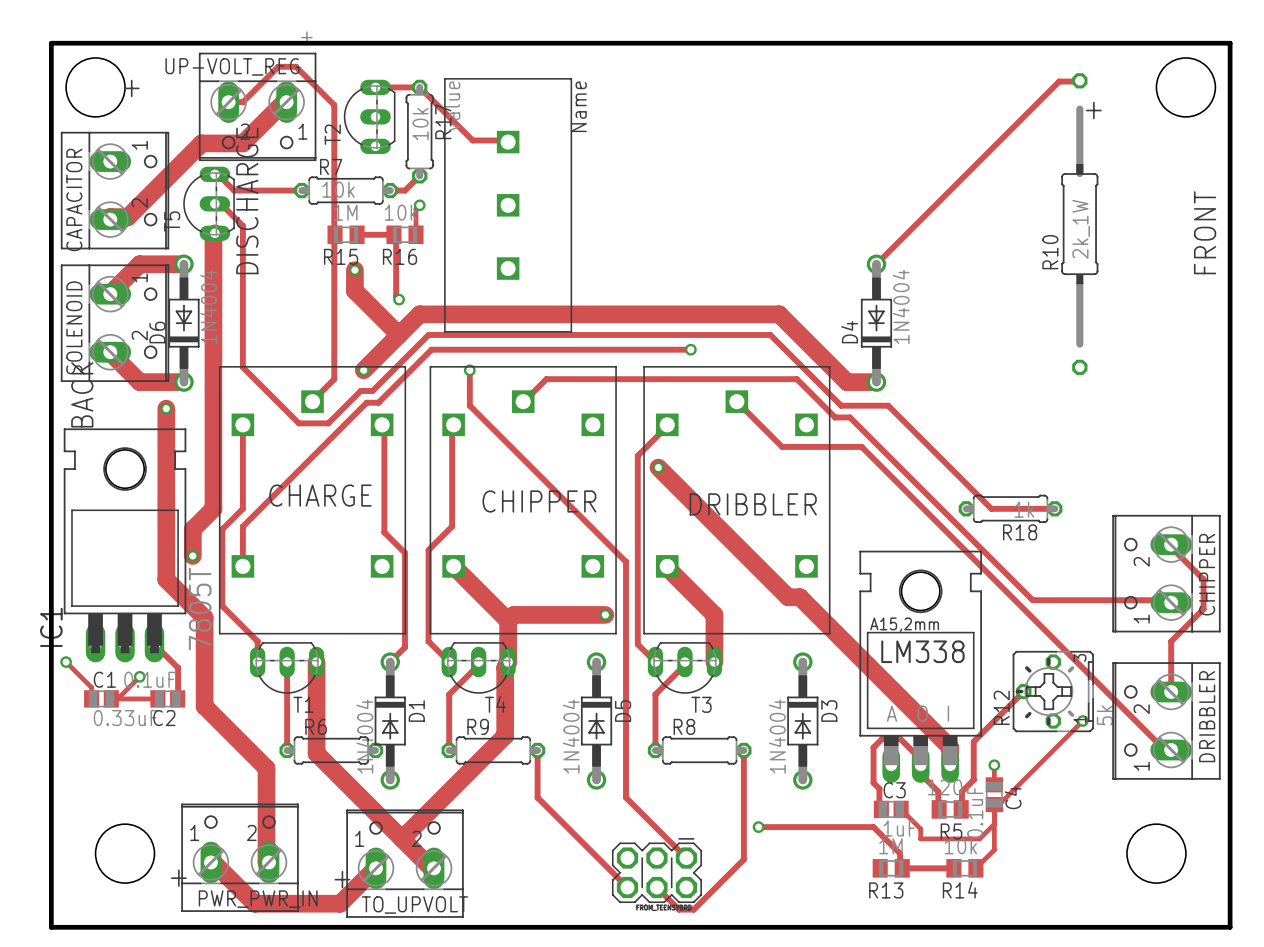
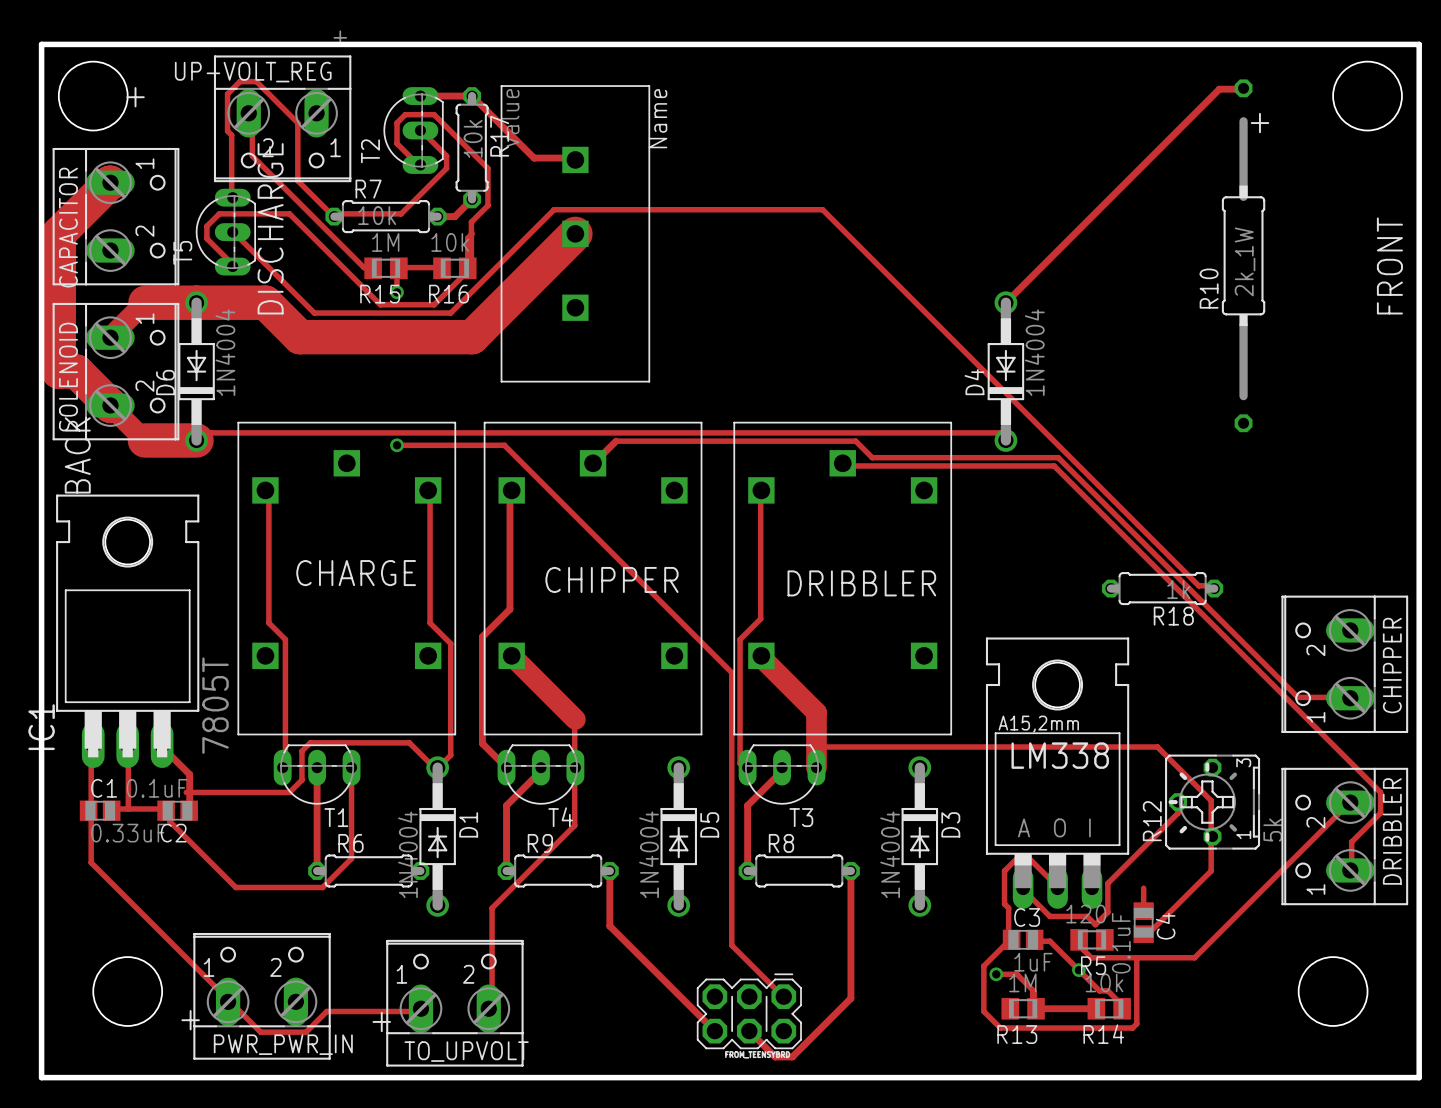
track: (228, 102) (242, 102) (278, 66) (295, 66) (334, 105) (334, 379) (312, 401) -> (248, 113) (252, 114) (252, 156) (363, 267) (373, 268)
track: (286, 102) (284, 102) (242, 143) (201, 143) (127, 217) (110, 217) (110, 219) -> none
track: none -> (110, 182) (58, 233) (58, 371) (76, 371) (110, 406)
track: (214, 174) (216, 172) (234, 190) (301, 190) -> (232, 197) (231, 135) (227, 131) (227, 94) (239, 81) (256, 81) (297, 122) (297, 180) (334, 216) (335, 213) (401, 213) (446, 168) (446, 156) (420, 130)
track: (214, 203) (222, 205) (242, 225) (242, 367) (298, 423) (328, 423) (360, 390) (372, 390) (428, 334) (770, 334) (841, 405) (888, 405) (991, 508) (1054, 508) -> (232, 232) (314, 313) (450, 313) (554, 209) (822, 209) (1198, 585) (1211, 585) (1214, 588)
via: (419, 205) -> none
track: none -> (575, 233) (472, 337) (299, 337) (265, 302) (196, 302)
track: (214, 233) (213, 508) (192, 529) (192, 555) -> (232, 266) (206, 238) (206, 226) (219, 213) (289, 213) (380, 304) (434, 304) (467, 271) (467, 268) (471, 267) (471, 222) (487, 205) (487, 168) (434, 114) (405, 114) (397, 122) (397, 143) (420, 164)
track: (357, 234) (396, 234) (396, 296) (399, 299) -> none
track: none -> (441, 268) (398, 268) (397, 271) (397, 292)
track width: thin (140, 264) (183, 264) -> thick (145, 302) (196, 302)
track: (354, 270) (354, 290) (399, 334) -> none
via position: (354, 270) -> (397, 292)
via: (399, 299) -> none
track: (690, 349) (431, 349) (378, 402) (366, 402) (242, 526) (242, 566) -> none
via: (690, 349) -> none
track: (363, 370) (419, 314) (779, 314) (847, 382) (876, 382) -> (196, 440) (211, 432) (1000, 432) (1005, 440)
via position: (363, 370) -> (397, 445)
track: (469, 370) (469, 405) (626, 561) (626, 797) (686, 858) -> (397, 445) (504, 445) (731, 672) (731, 945) (783, 996)
via: (469, 370) -> none
track width: thin (139, 382) (183, 382) -> thick (144, 440) (196, 440)
track: (542, 382) (546, 379) (796, 379) (835, 417) (849, 417) (1032, 600) (1171, 600) (1171, 602) -> (616, 441) (855, 441) (872, 457) (1058, 457) (1297, 697) (1350, 698)
track: (736, 401) (782, 446) (861, 446) (1162, 747) (1171, 747) (1171, 750) -> (842, 463) (843, 465) (1054, 465) (1380, 792) (1380, 813) (1351, 842) (1350, 870)
track: (166, 408) (166, 579) (204, 617) (204, 706) (266, 768) (266, 862) (268, 862) -> none
via: (166, 408) -> none
track: (242, 424) (242, 508) (222, 529) (222, 606) (257, 641) (257, 662) -> (265, 490) (268, 490) (268, 623) (285, 639) (285, 767) (282, 767)
track: (382, 424) (384, 426) (384, 532) (404, 553) (404, 647) (390, 662) -> (428, 490) (430, 490) (430, 623) (450, 643) (450, 755) (438, 767) (434, 767) (409, 742) (310, 742) (301, 751) (301, 780) (289, 792) (186, 792)
track: (667, 424) (637, 455) (637, 644) (655, 662) -> (761, 490) (760, 618) (740, 639) (740, 763) (744, 767) (747, 767)
track: (658, 467) (788, 597) (799, 597) (950, 747) (950, 765) -> none
via: (658, 467) -> none
track: (1171, 544) (1171, 547) (1203, 579) (1203, 609) (1171, 641) (1171, 692) -> none
via: (192, 555) -> none
track: (605, 614) (514, 614) (508, 620) (508, 662) (505, 667) (505, 735) (402, 838) -> none
via: (605, 614) -> none
track: none -> (127, 745) (128, 808)
track: none -> (814, 746) (1157, 746) (1211, 800) (1211, 870) (1149, 932) (1143, 934)
track: (66, 662) (91, 687) (91, 698) -> none
via: (66, 662) -> none
track width: thick (316, 662) (316, 739) -> thin (351, 767) (351, 858)
track: (139, 676) (117, 698) -> none
via: (139, 676) -> none
track: (1023, 691) (973, 741) (973, 779) (961, 791) (961, 809) -> (1178, 802) (1178, 813) (1107, 883) (1107, 912) (1095, 924) (1087, 916) (1049, 916) (1023, 888)
track: (111, 698) (157, 698) -> (111, 810) (111, 808) (165, 808) (169, 813) (169, 821) (235, 887) (322, 887) (351, 858)
track: (1082, 721) (999, 804) (994, 804) (994, 849) (975, 868) -> none
via: (1082, 721) -> none
track: (316, 739) (316, 753) (431, 868) (433, 868) -> (511, 655) (574, 718) (574, 825) (492, 908) (492, 1007) (488, 1008)
track: none -> (1057, 888) (1029, 858) (1016, 858) (1004, 870) (1004, 904) (1008, 908) (1008, 937) (1011, 939) (983, 966) (983, 1011) (1000, 1028) (1132, 1028) (1136, 1023) (1136, 957)
via: (994, 765) -> none
track: (881, 809) (879, 809) (879, 788) (873, 782) (873, 747) (882, 738) (900, 738) (920, 759) (920, 774) (938, 791) (939, 809) -> (1350, 802) (1194, 957) (1091, 957) (1083, 949) (1083, 941) (1079, 939)
track: (901, 809) (920, 829) (920, 838) (979, 838) (994, 824) -> (1034, 939) (1049, 941) (1099, 990) (1107, 990) (1124, 1007) (1122, 1008)
track: (758, 827) (873, 827) (900, 853) -> (996, 974) (1016, 974) (1033, 991)
via: (758, 827) -> none
via: none -> (1078, 970)
via: none -> (996, 974)
track: (210, 862) (213, 862) (254, 903) (340, 903) (375, 868) -> (93, 745) (91, 746) (91, 808) (88, 810) (91, 813) (91, 862) (227, 999) (228, 1001) (260, 1032) (306, 1032) (326, 1011) (417, 1011) (420, 1008)

